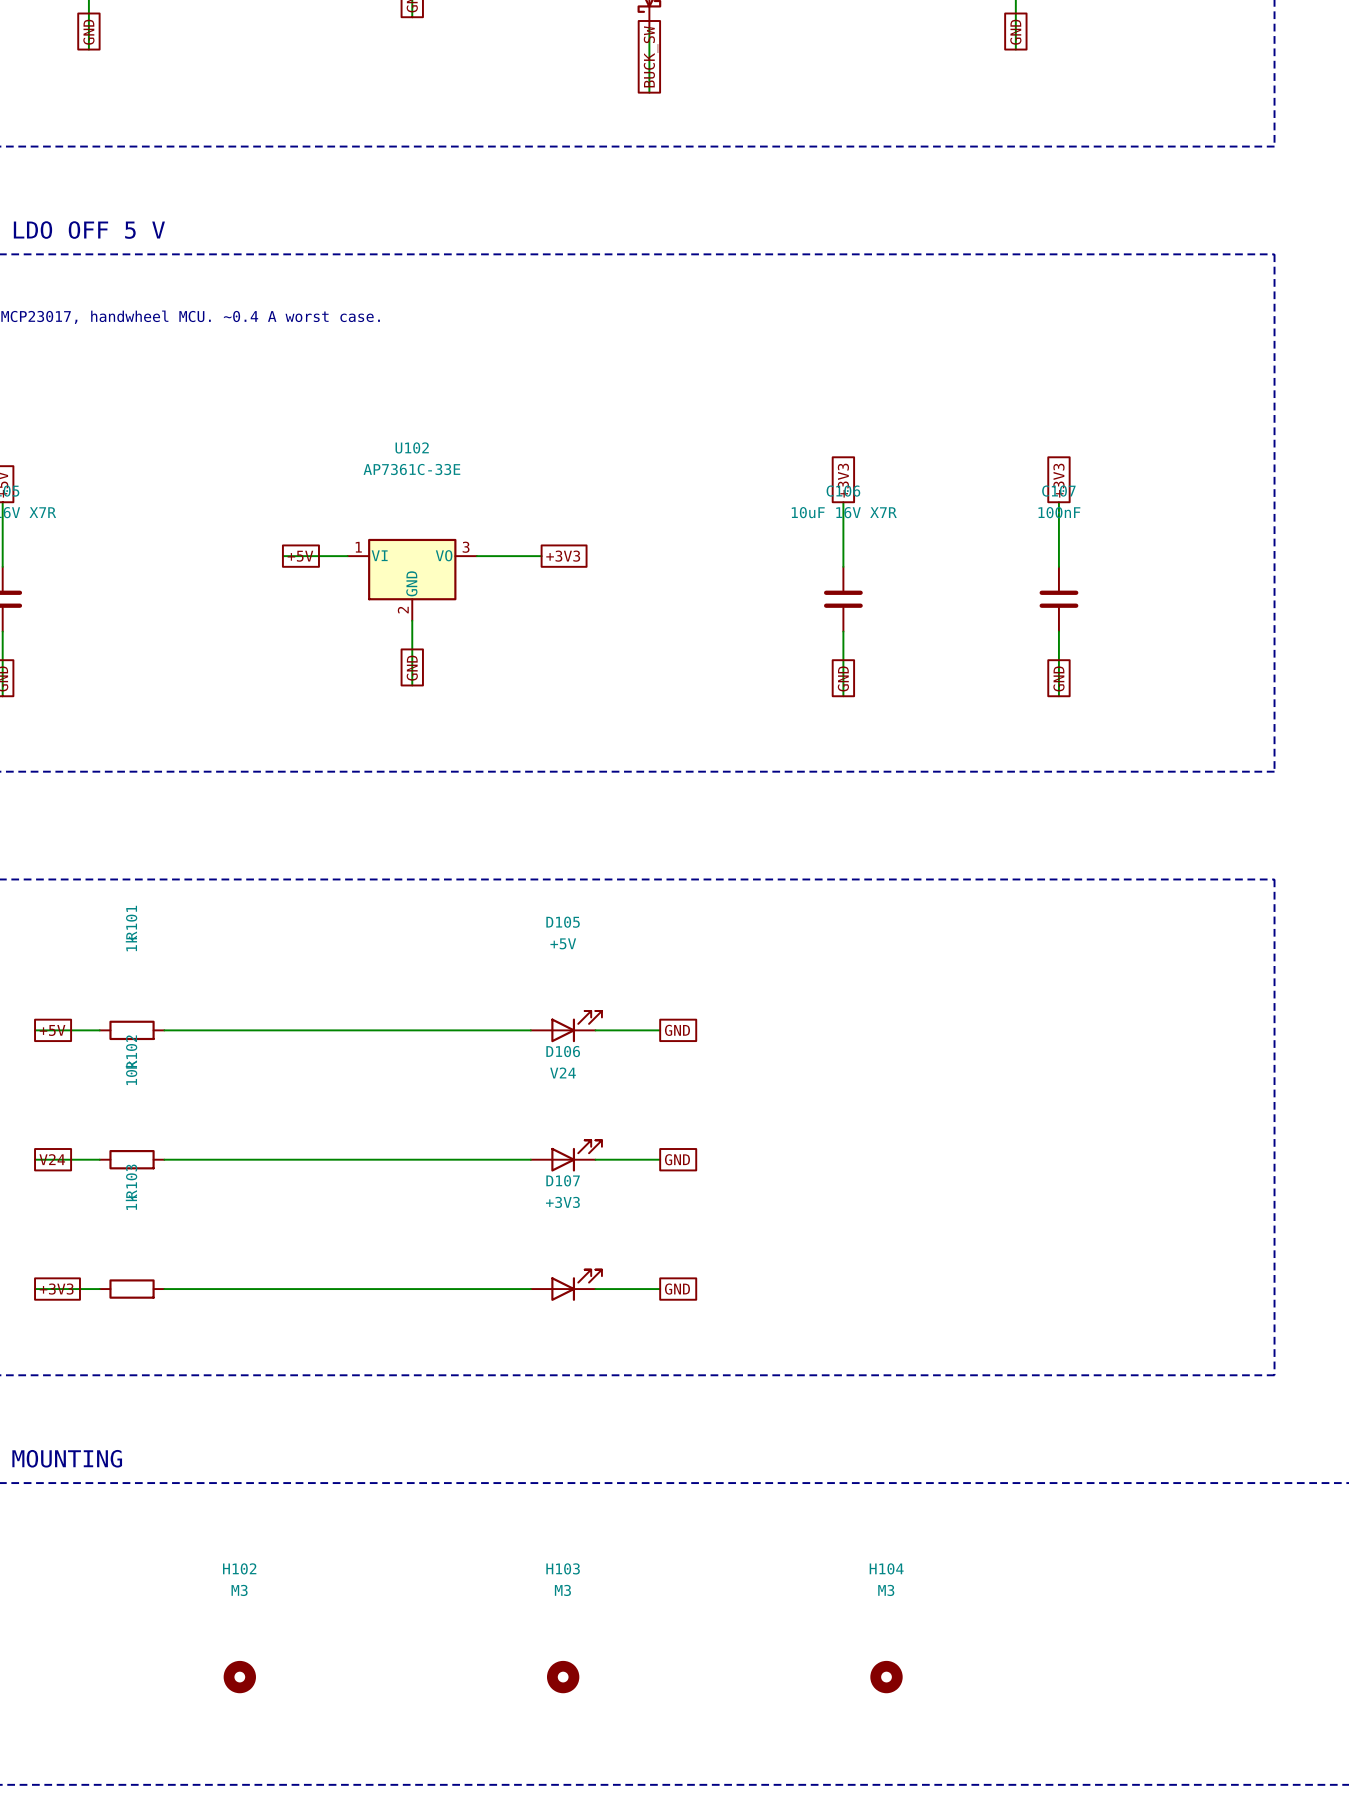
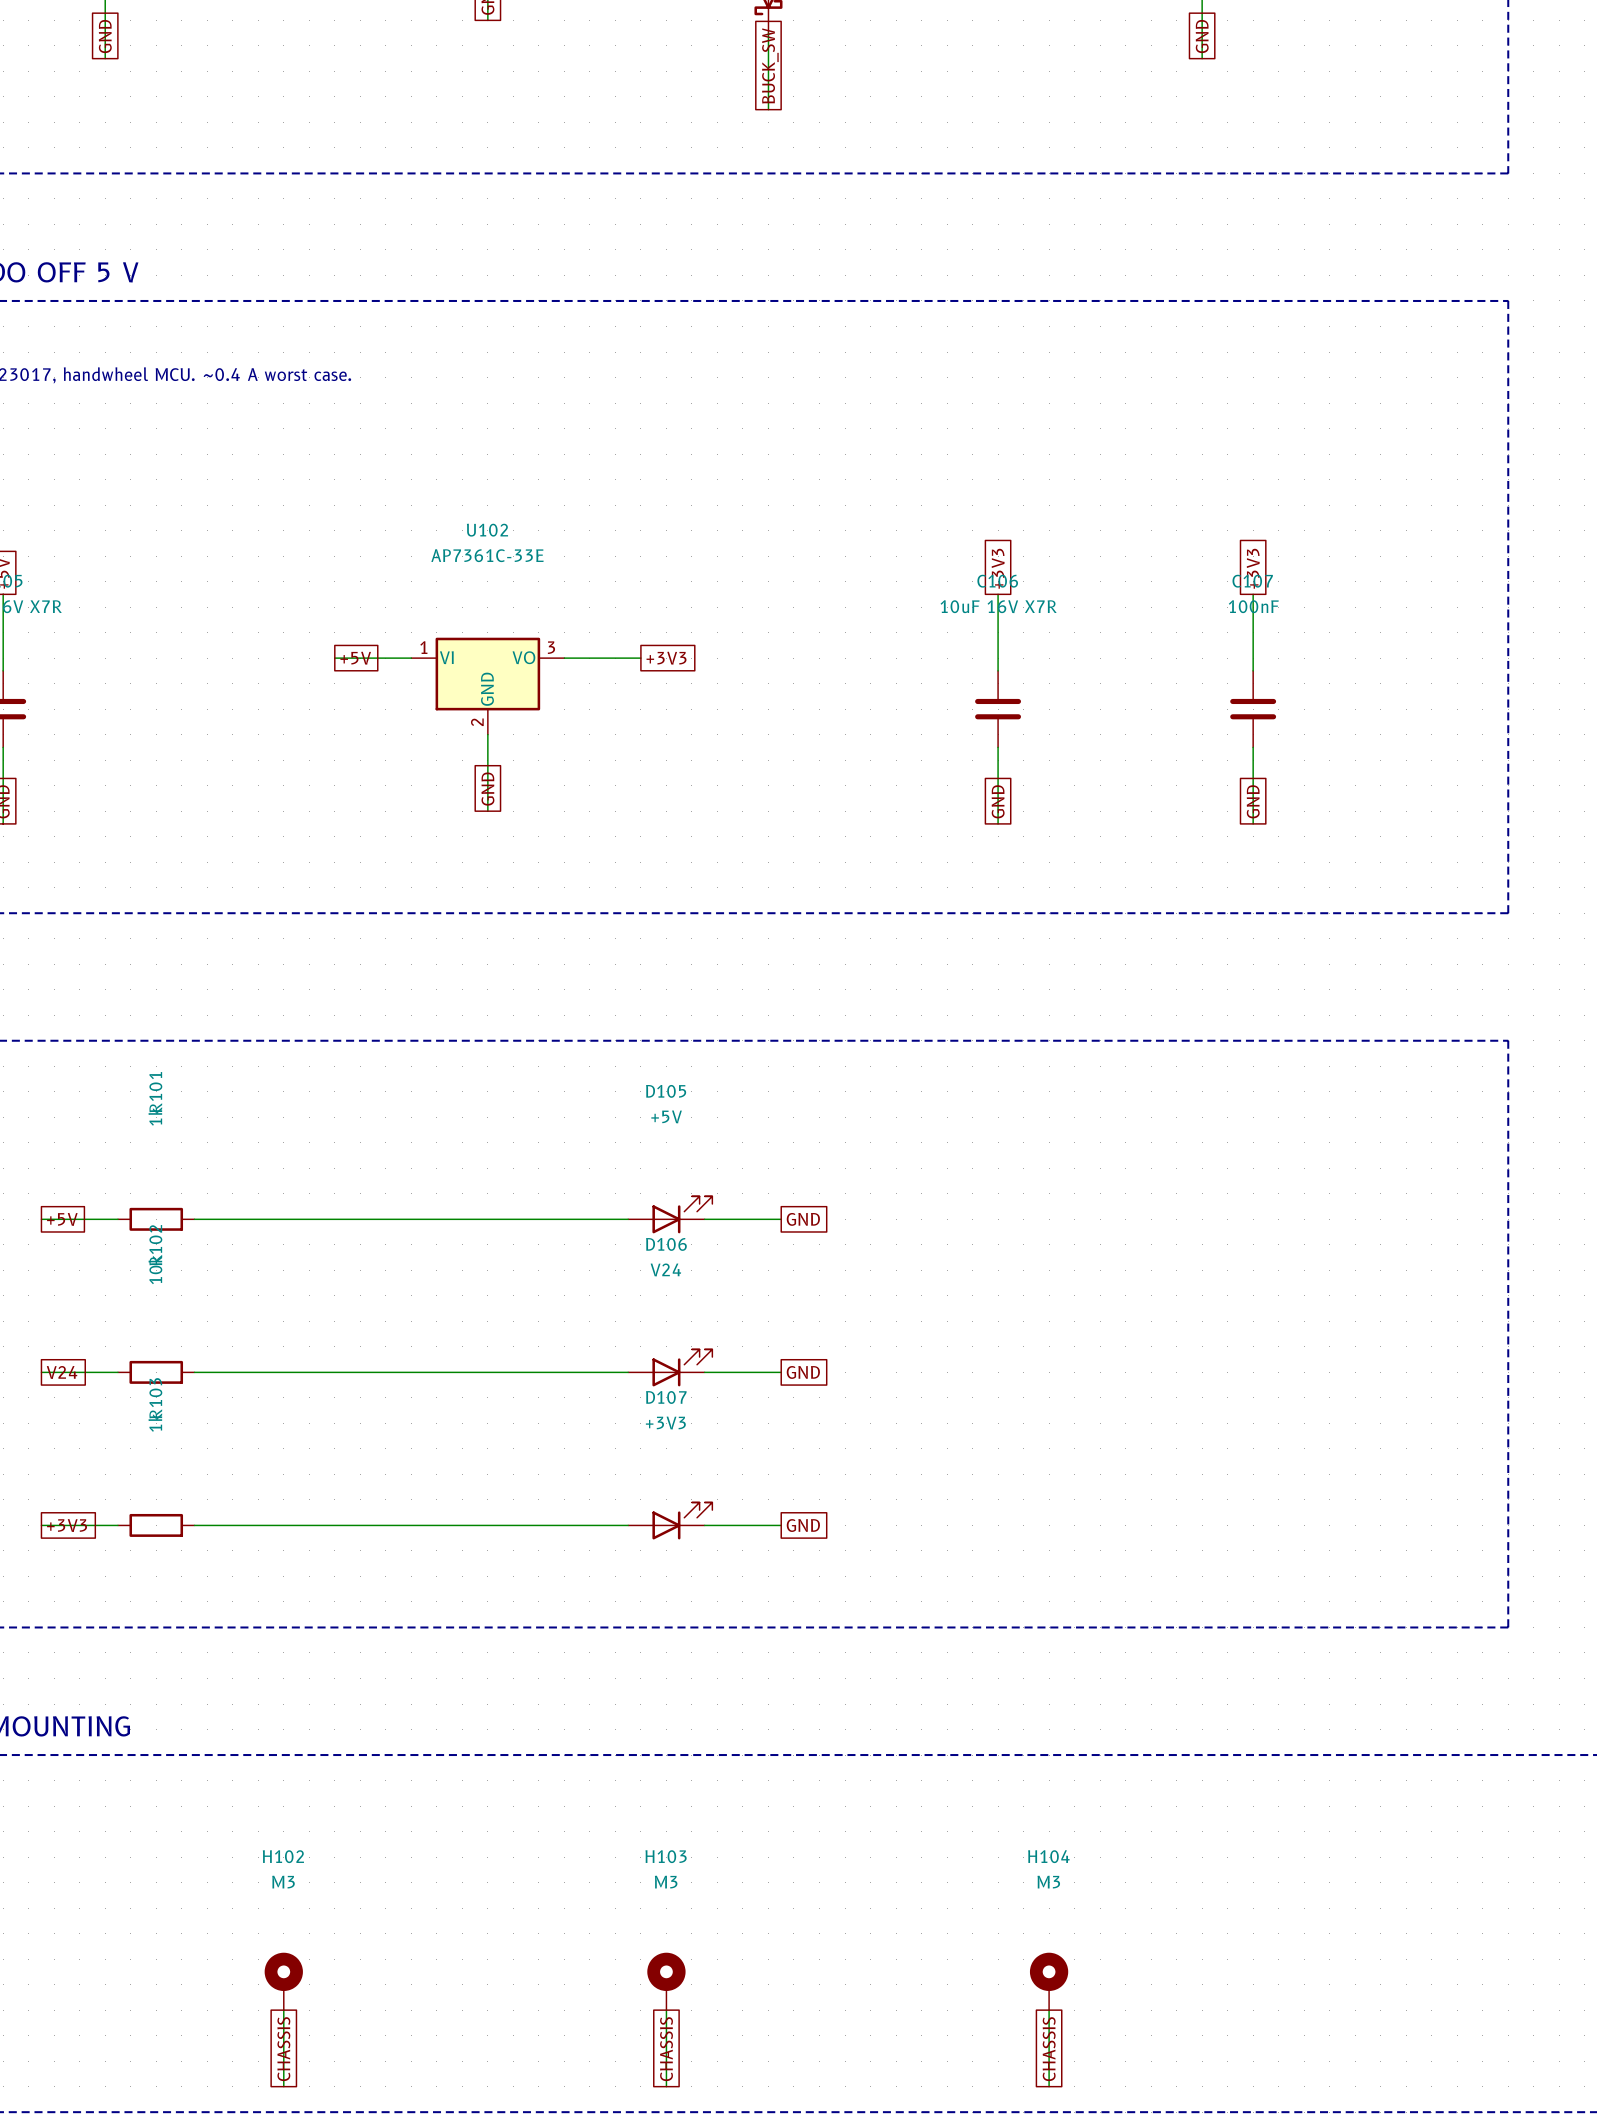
H102 symbol: [223, 1660, 256, 1694] -> [264, 1952, 303, 2011]
H103 symbol: [546, 1660, 580, 1694] -> [647, 1952, 686, 2011]
H104 symbol: [870, 1660, 903, 1694] -> [1029, 1952, 1069, 2011]
wire: none -> (283, 2010) (283, 2086)
wire: none -> (666, 2010) (666, 2086)
wire: none -> (1049, 2010) (1049, 2086)
global label: none -> CHASSIS (283, 2049)
global label: none -> CHASSIS (666, 2049)
global label: none -> CHASSIS (1049, 2049)

